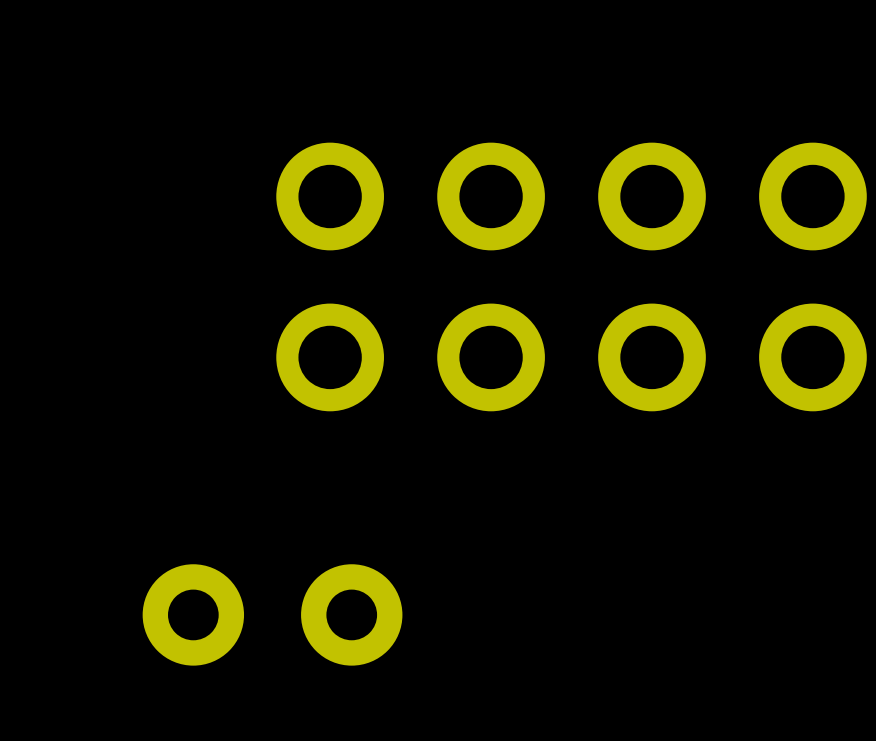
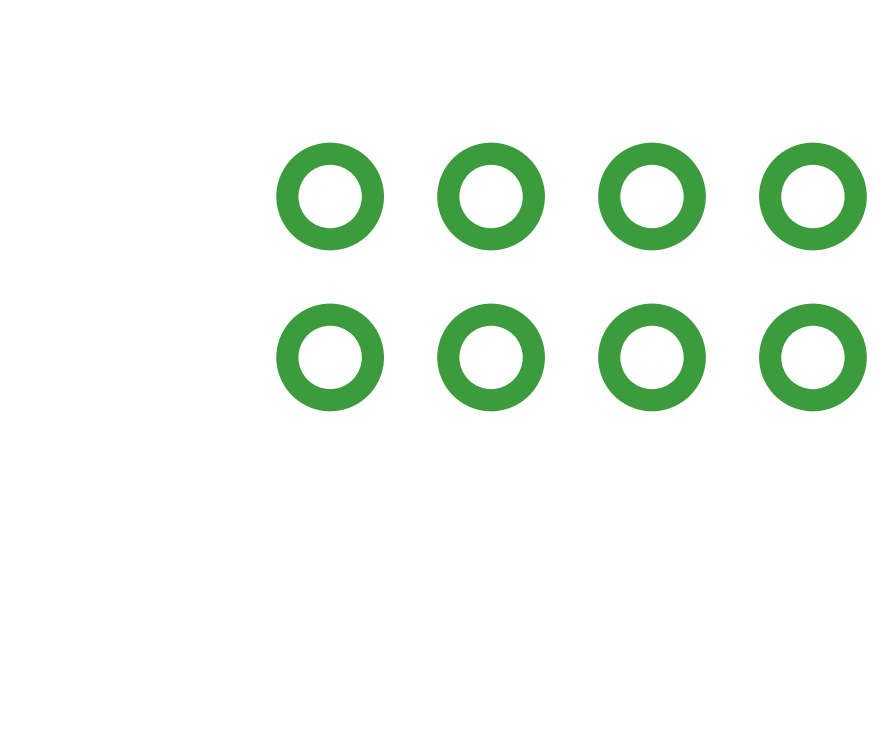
part: (272, 614) -> none

